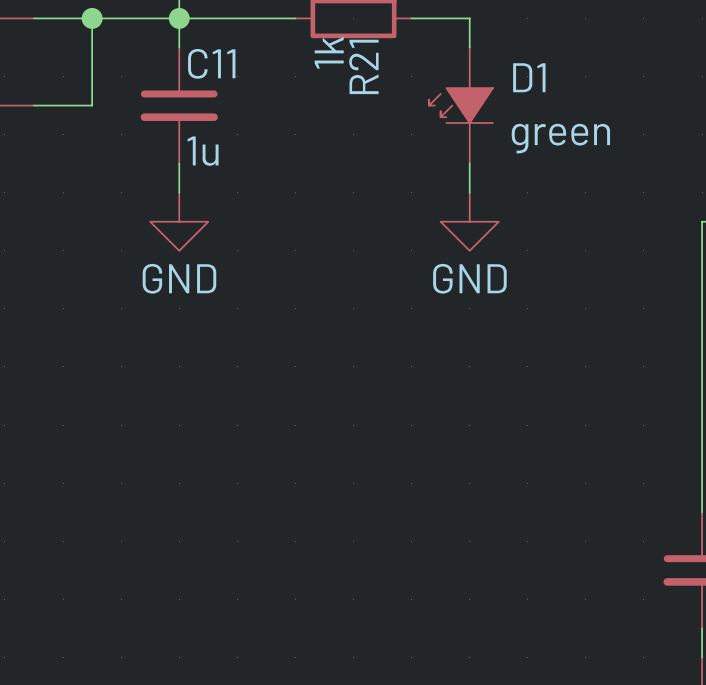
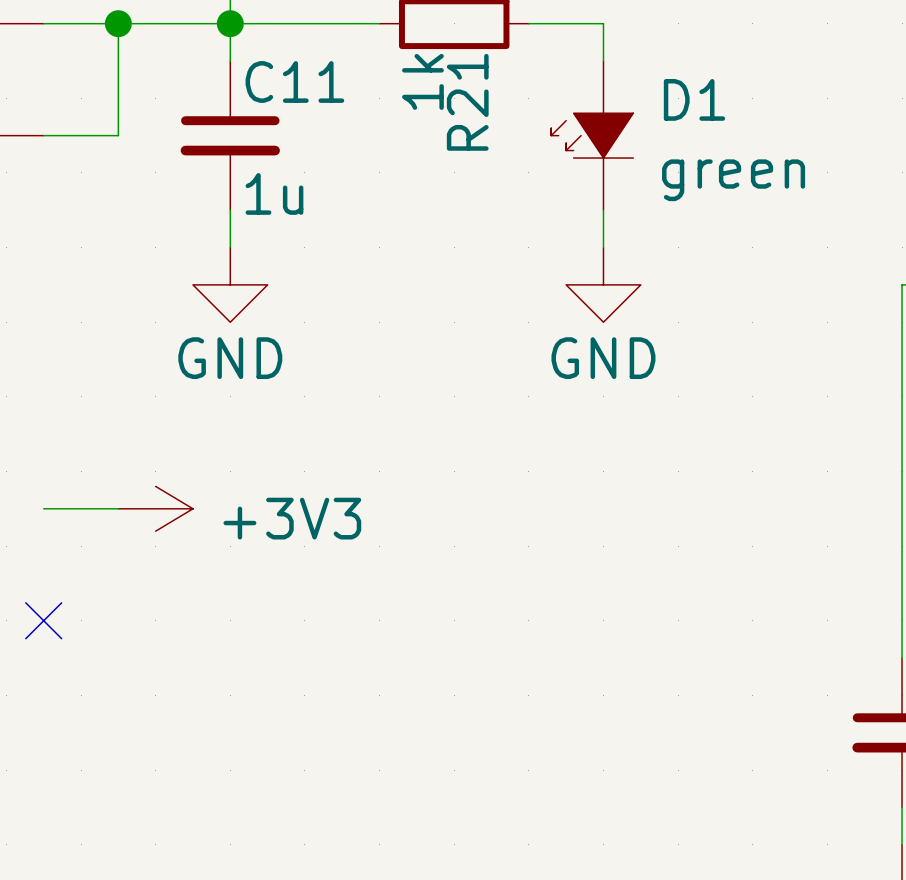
wire: none -> (43, 508) (118, 508)
power symbol: none -> +3V3 (155, 508)
no-connect mark: none -> (43, 620)

